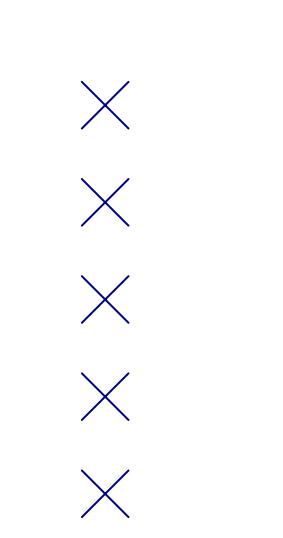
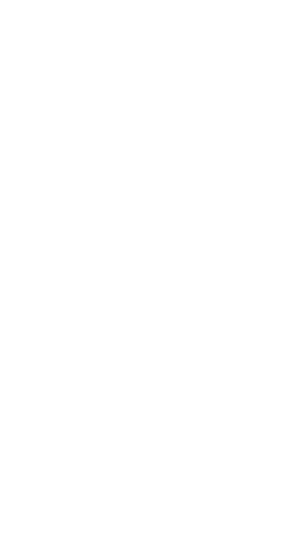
no-connect mark: (105, 105) -> none
no-connect mark: (105, 202) -> none
no-connect mark: (105, 299) -> none
no-connect mark: (105, 396) -> none
no-connect mark: (105, 493) -> none

